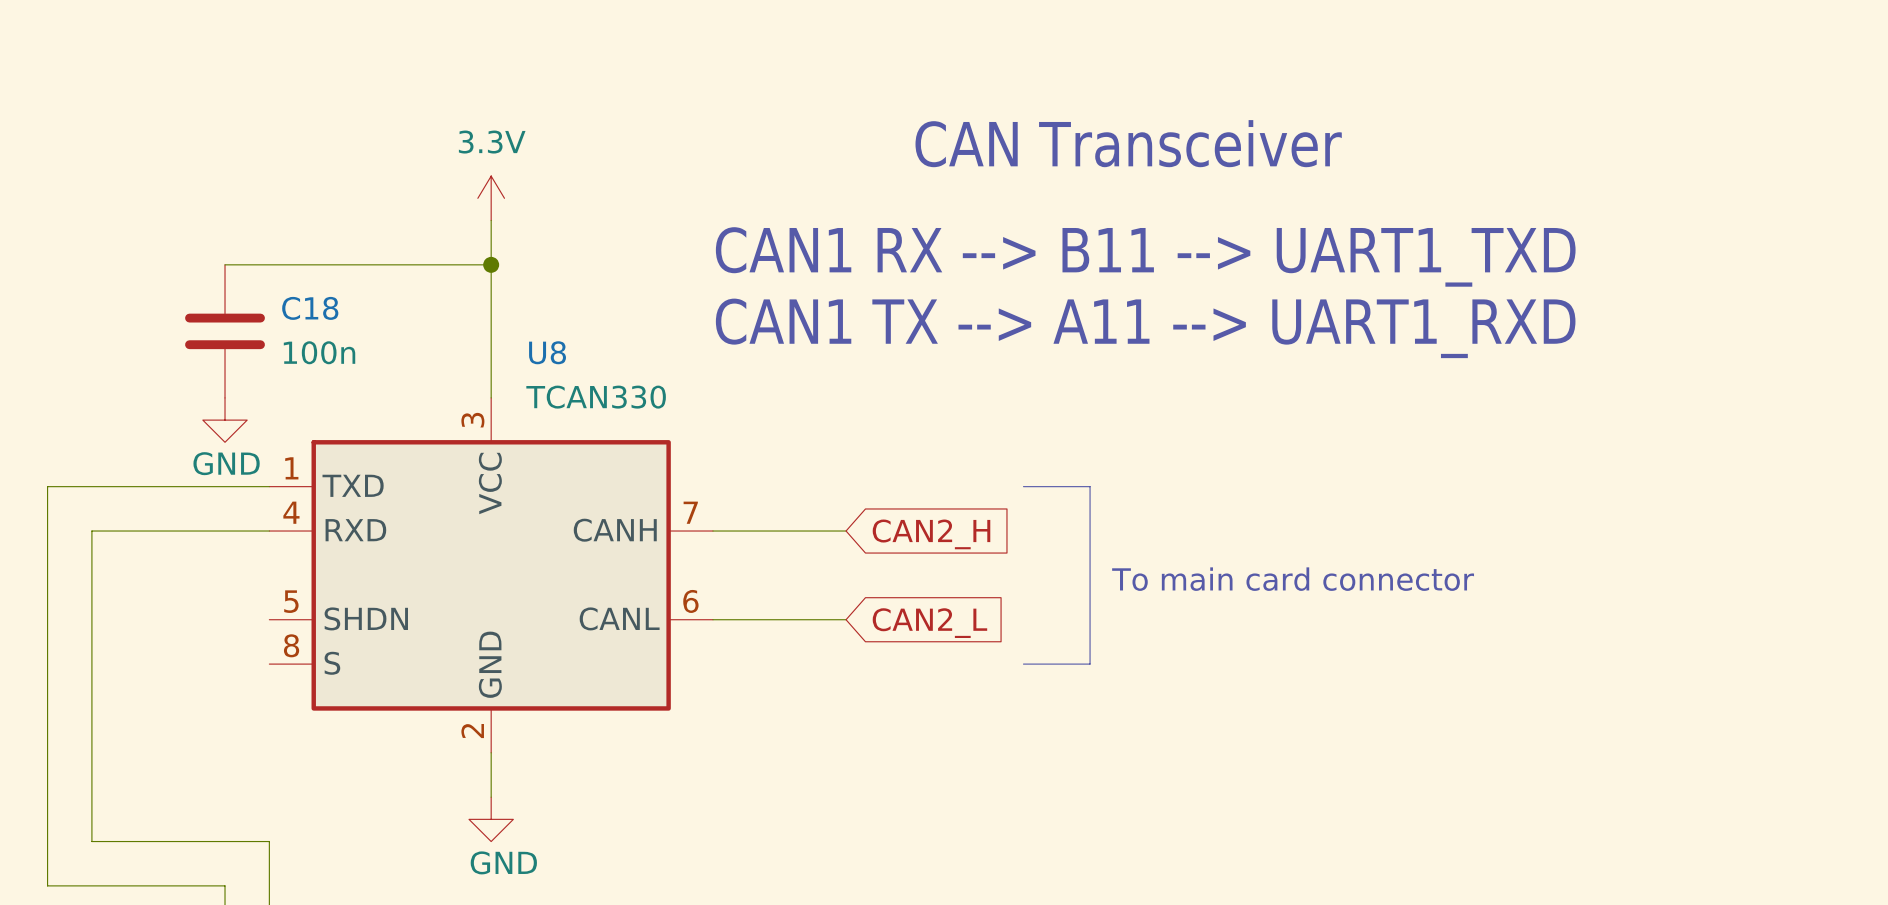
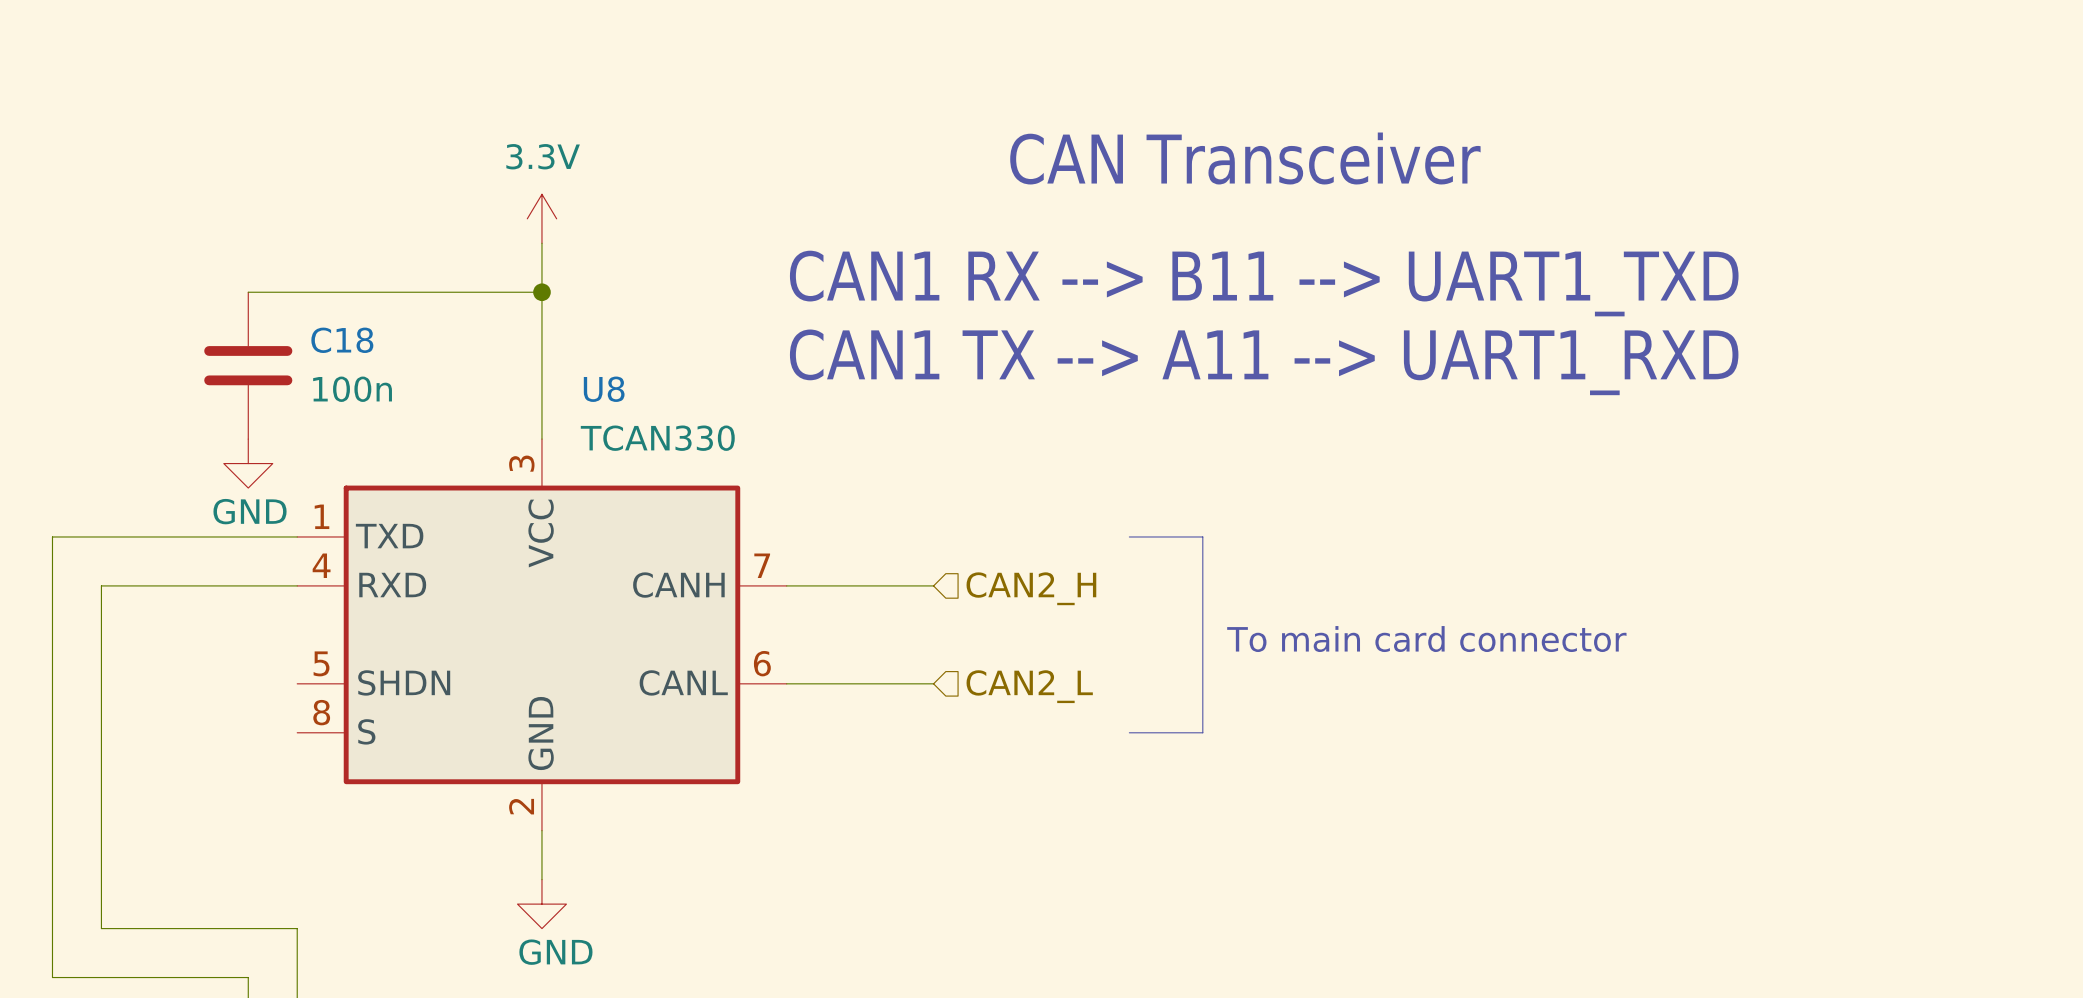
hierarchical label: none -> CAN2_H (1031, 588)
global label: CAN2_H (931, 534) -> none
hierarchical label: none -> CAN2_L (1029, 686)
global label: CAN2_L (929, 623) -> none

